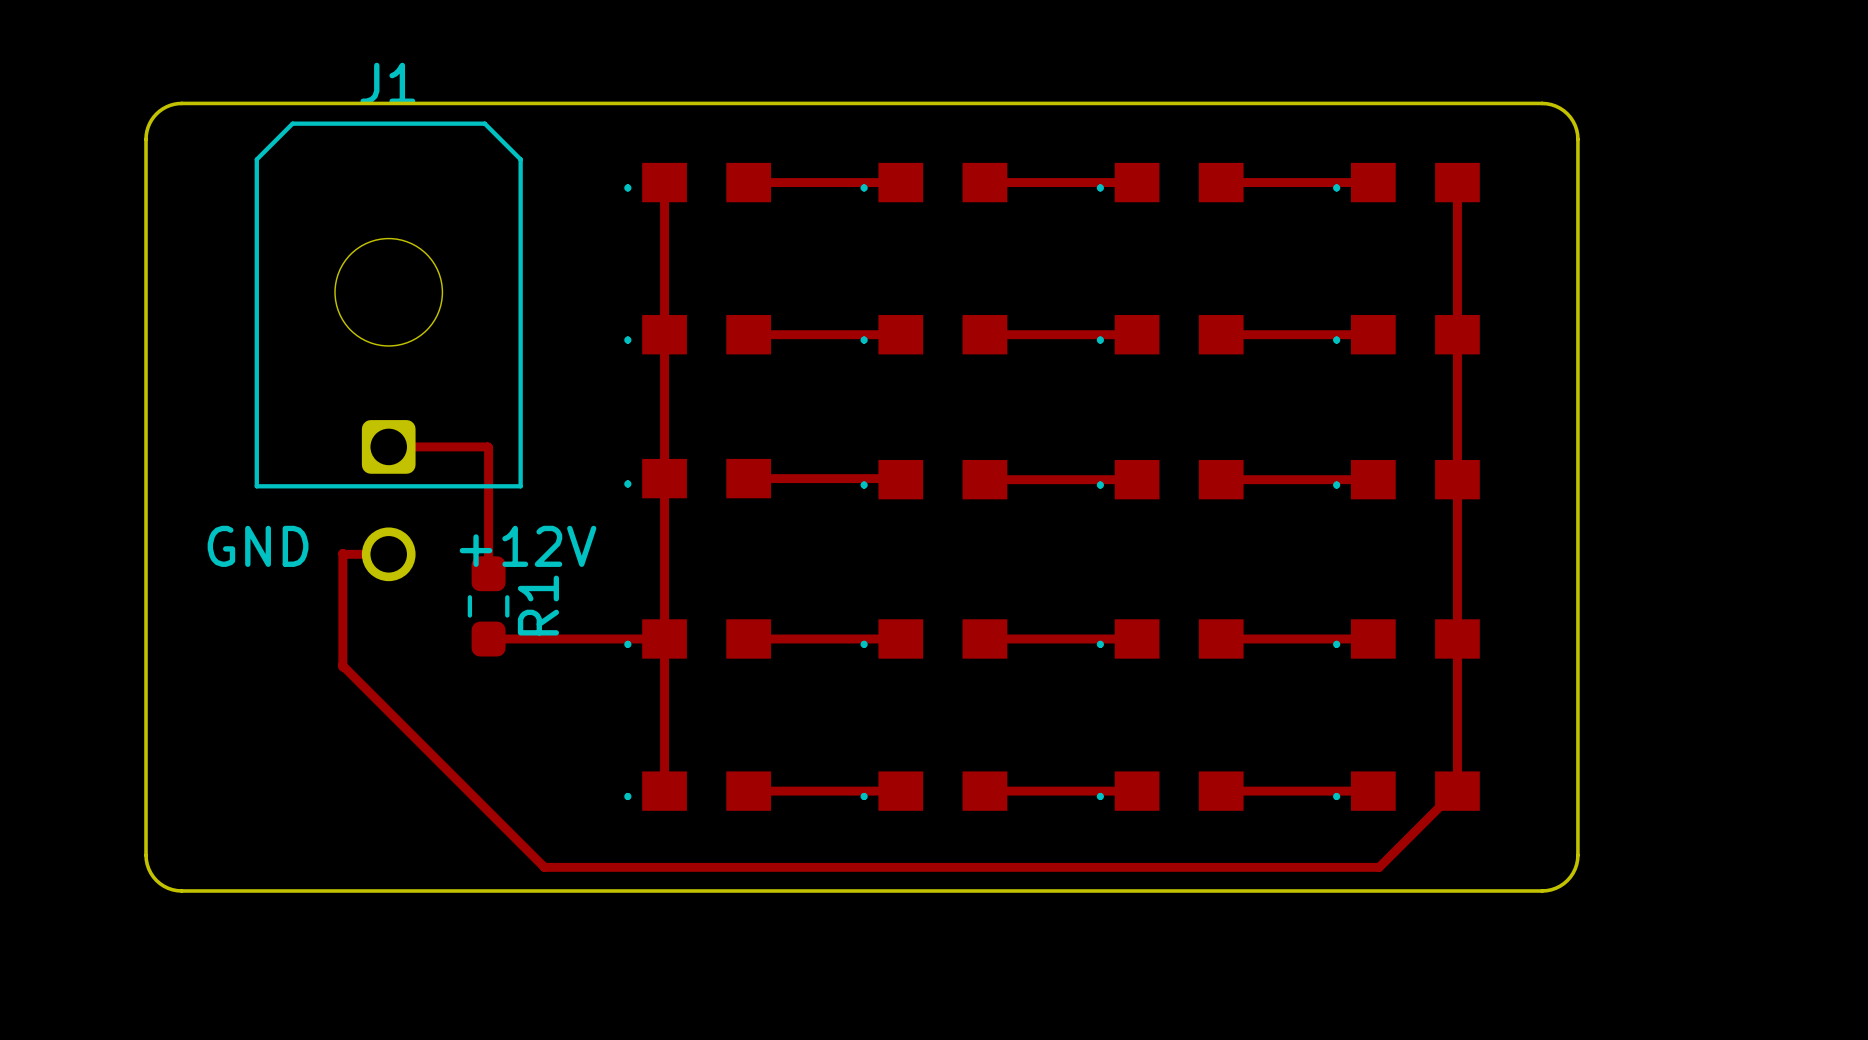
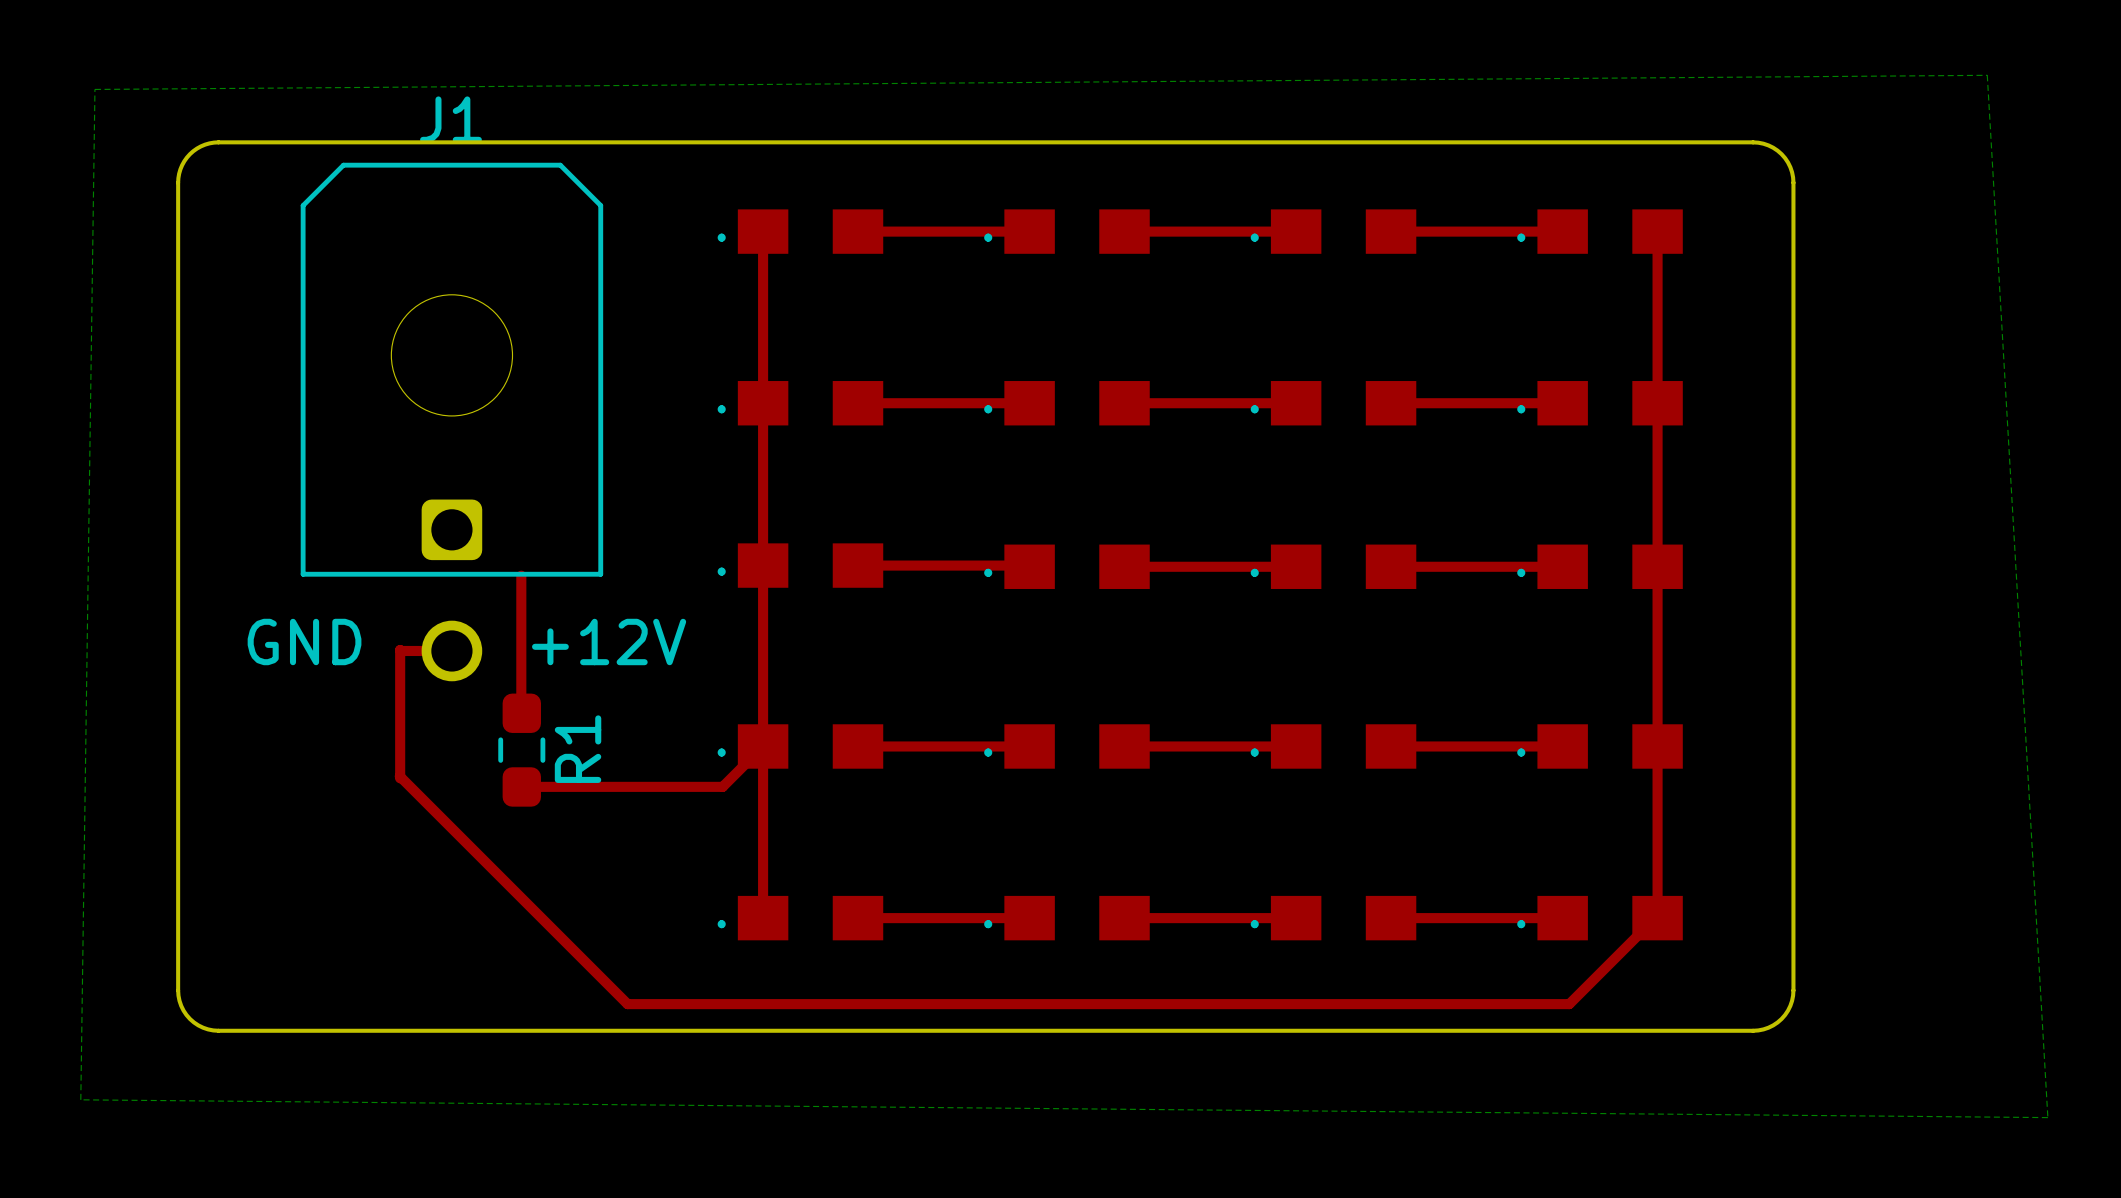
bottom zone outline: none -> (1987, 75) (94, 89) (80, 1099) (2047, 1117) (1987, 75)
top track: (388, 446) (488, 447) (488, 573) -> none
top track: none -> (521, 575) (521, 712)
R1 position: (488, 606) -> (521, 750)
top track: (488, 638) (664, 638) -> (521, 786) (722, 786) (763, 746)

